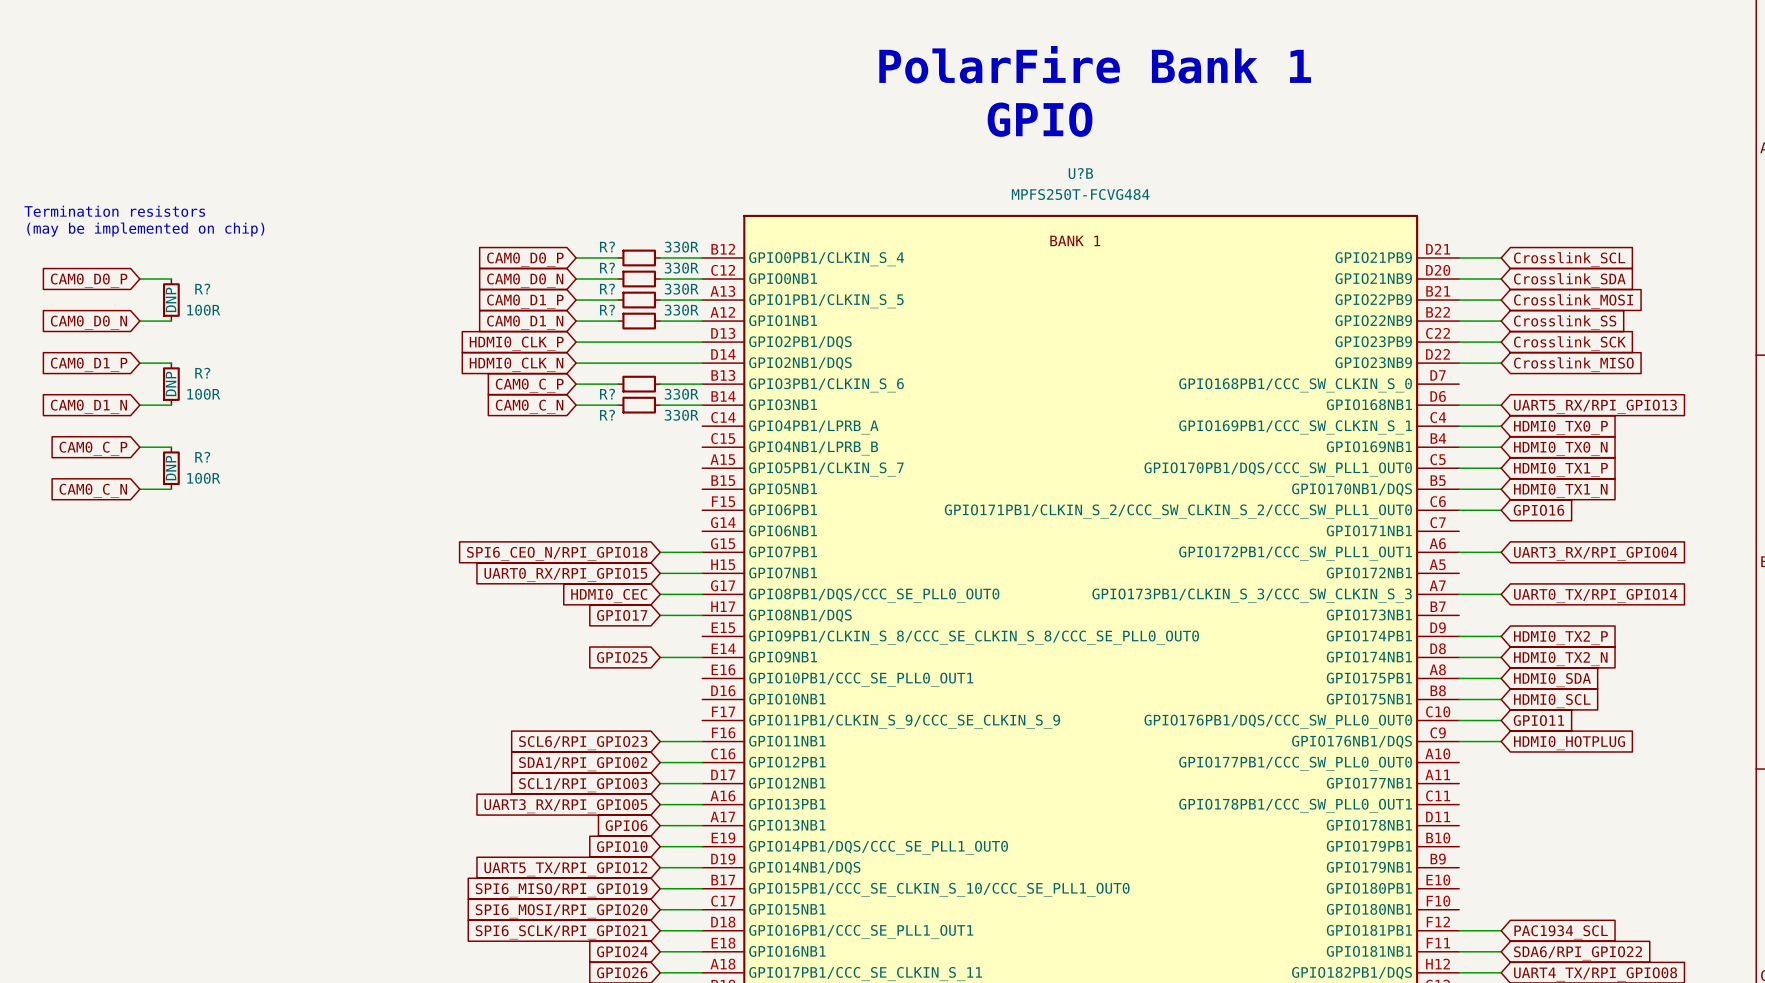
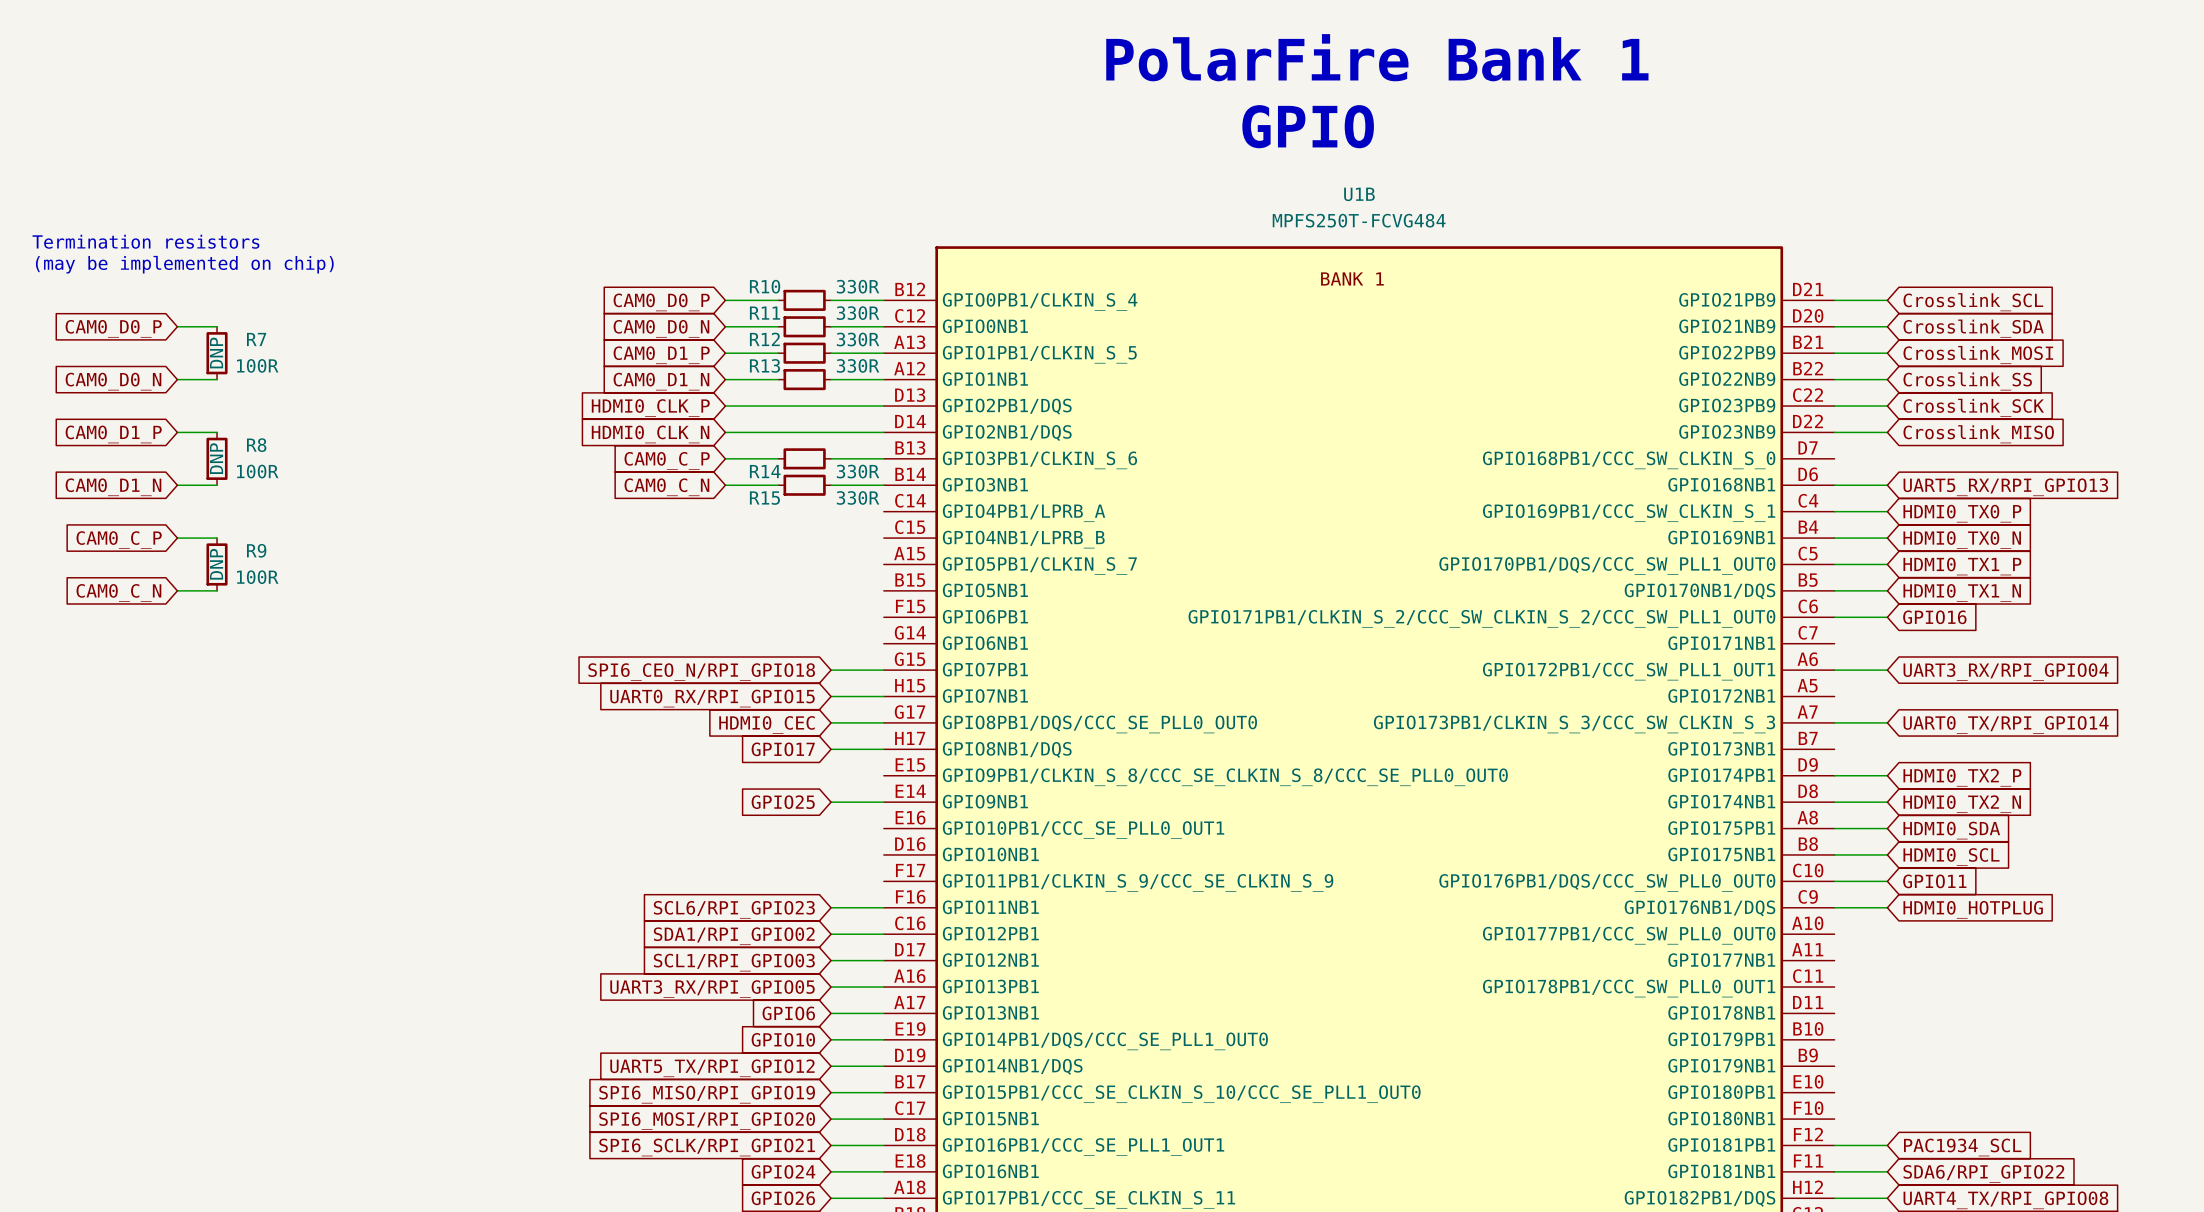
U?B name: U?B (1080, 173) -> U1B (1359, 194)
R? name: R? (607, 246) -> R10 (765, 286)
R? name: R? (607, 268) -> R11 (765, 313)
R? name: R? (202, 289) -> R7 (256, 339)
R? name: R? (607, 289) -> R12 (764, 339)
R? name: R? (607, 310) -> R13 (764, 365)
R? name: R? (202, 373) -> R8 (256, 445)
R? name: R? (607, 394) -> R14 (765, 471)
R? name: R? (607, 415) -> R15 (764, 498)
R? name: R? (202, 457) -> R9 (256, 550)

